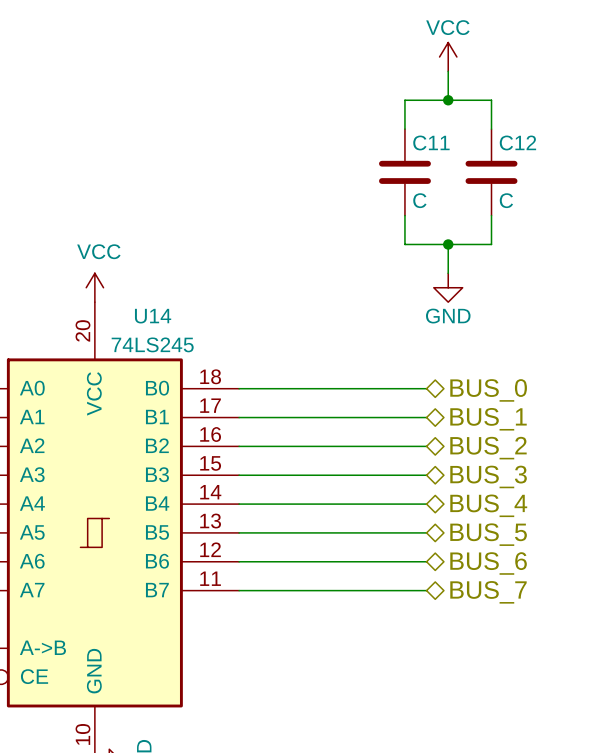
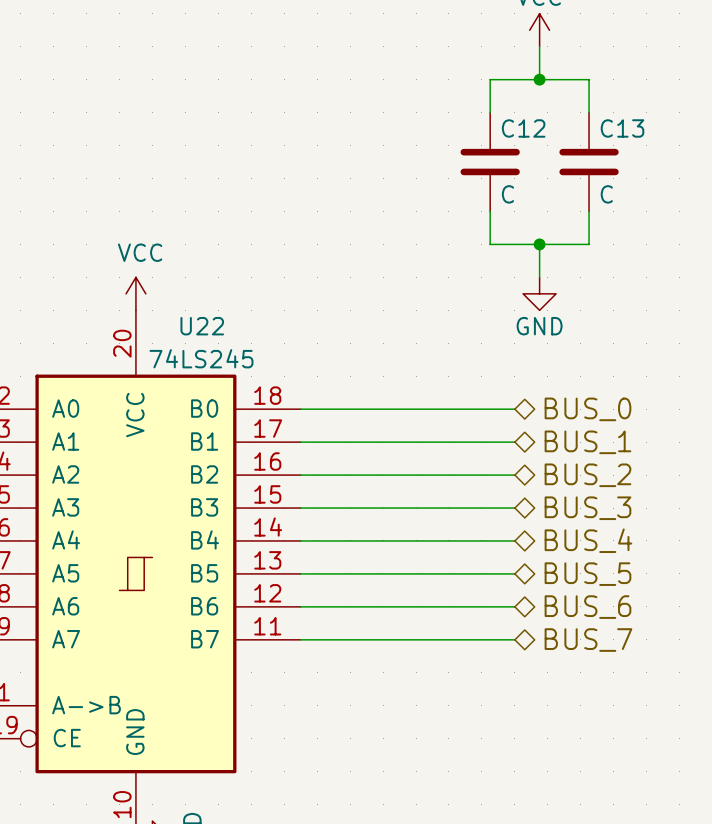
C11 name: C11 (431, 142) -> C12 (523, 128)
C12 name: C12 (517, 142) -> C13 (622, 128)
U14 name: U14 (153, 316) -> U22 (202, 326)

